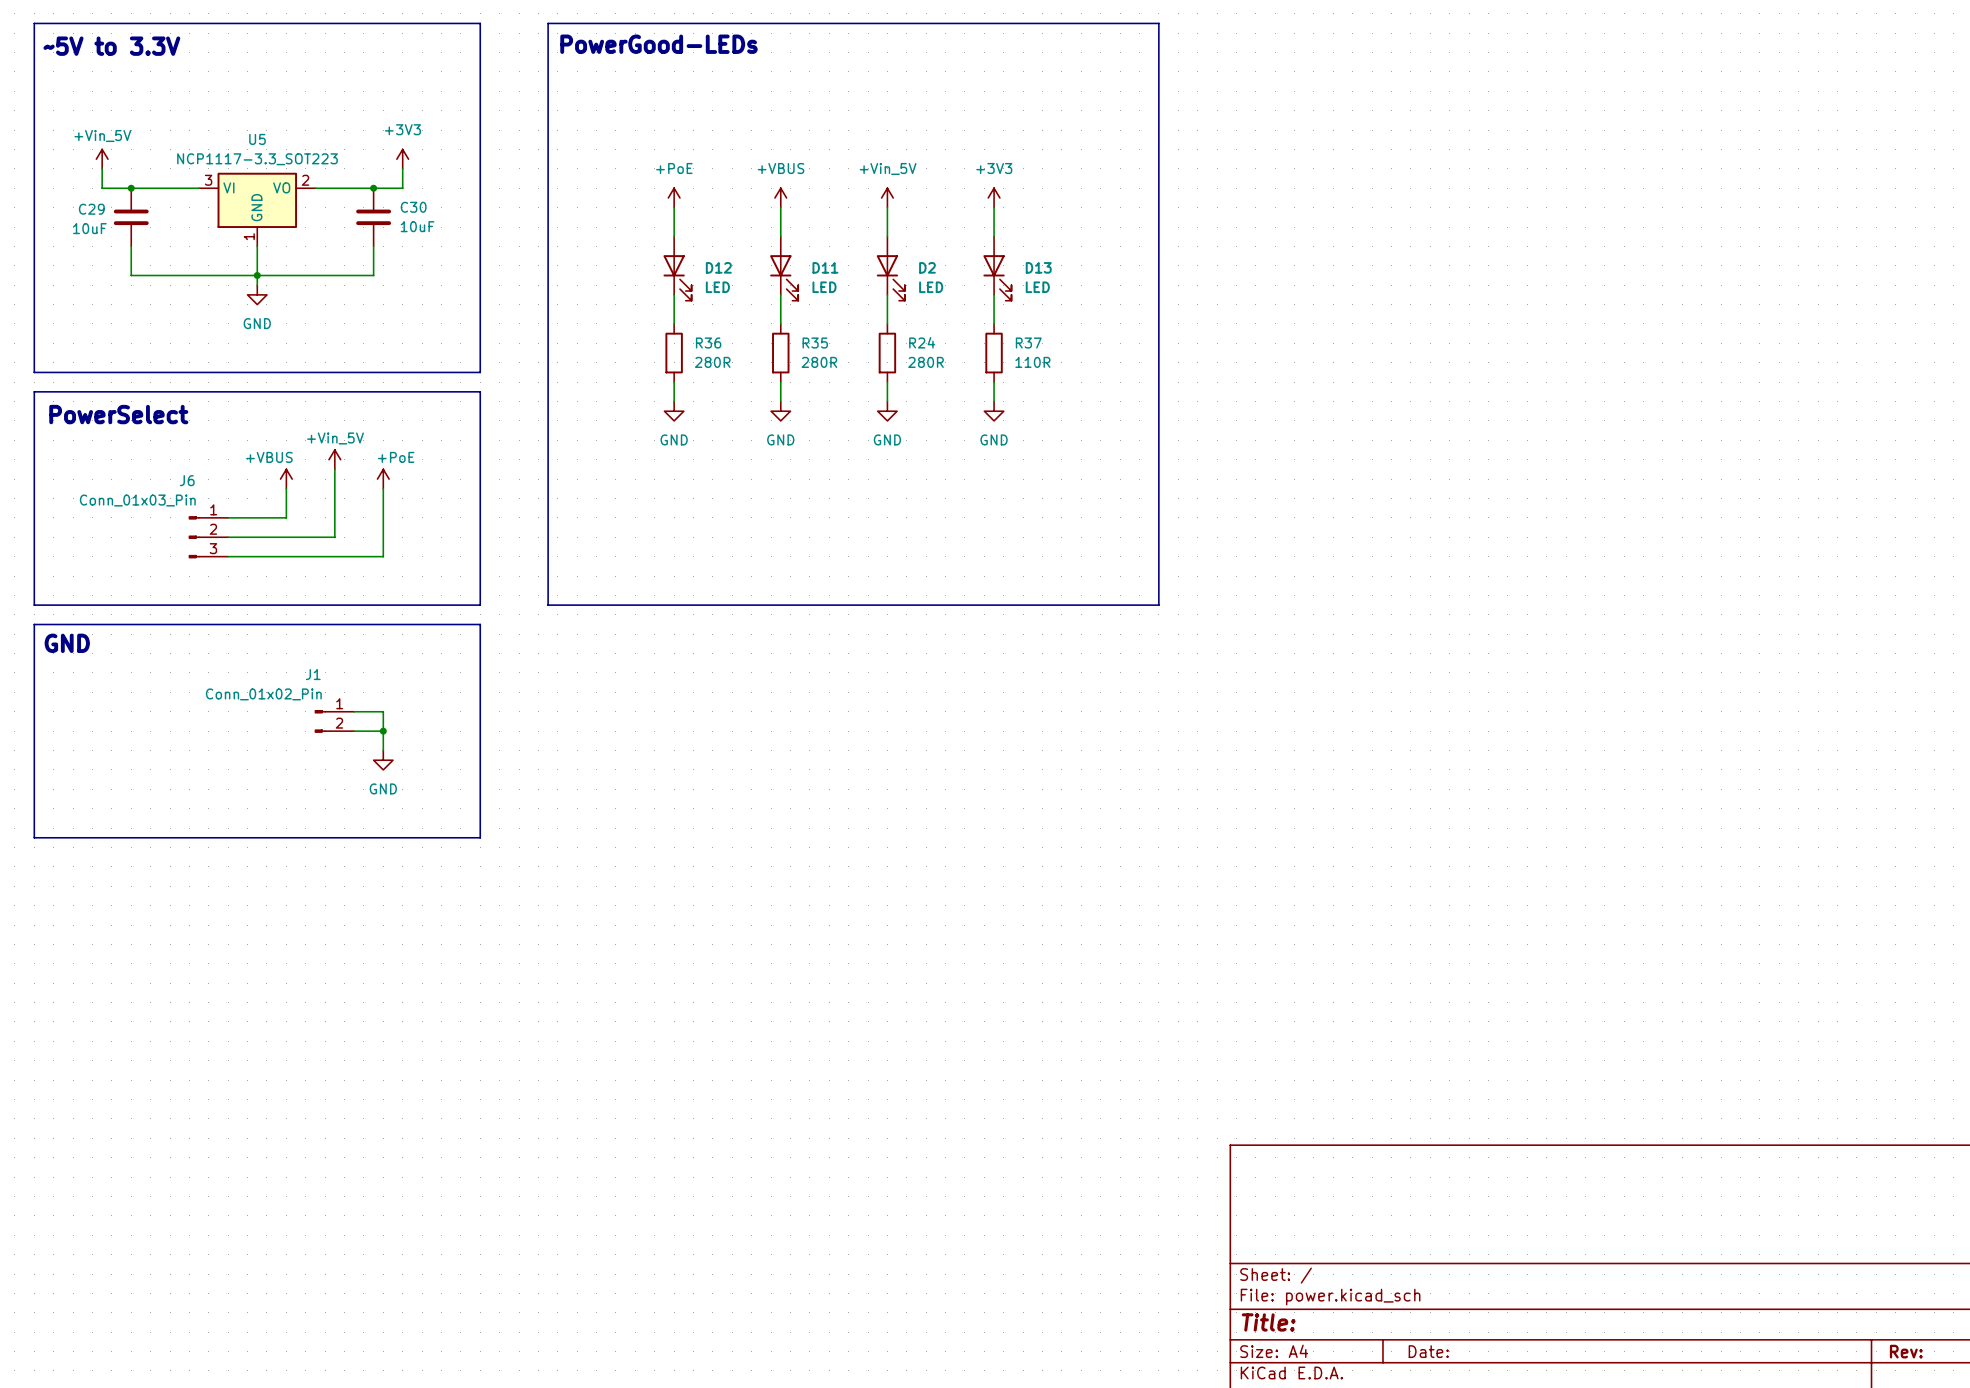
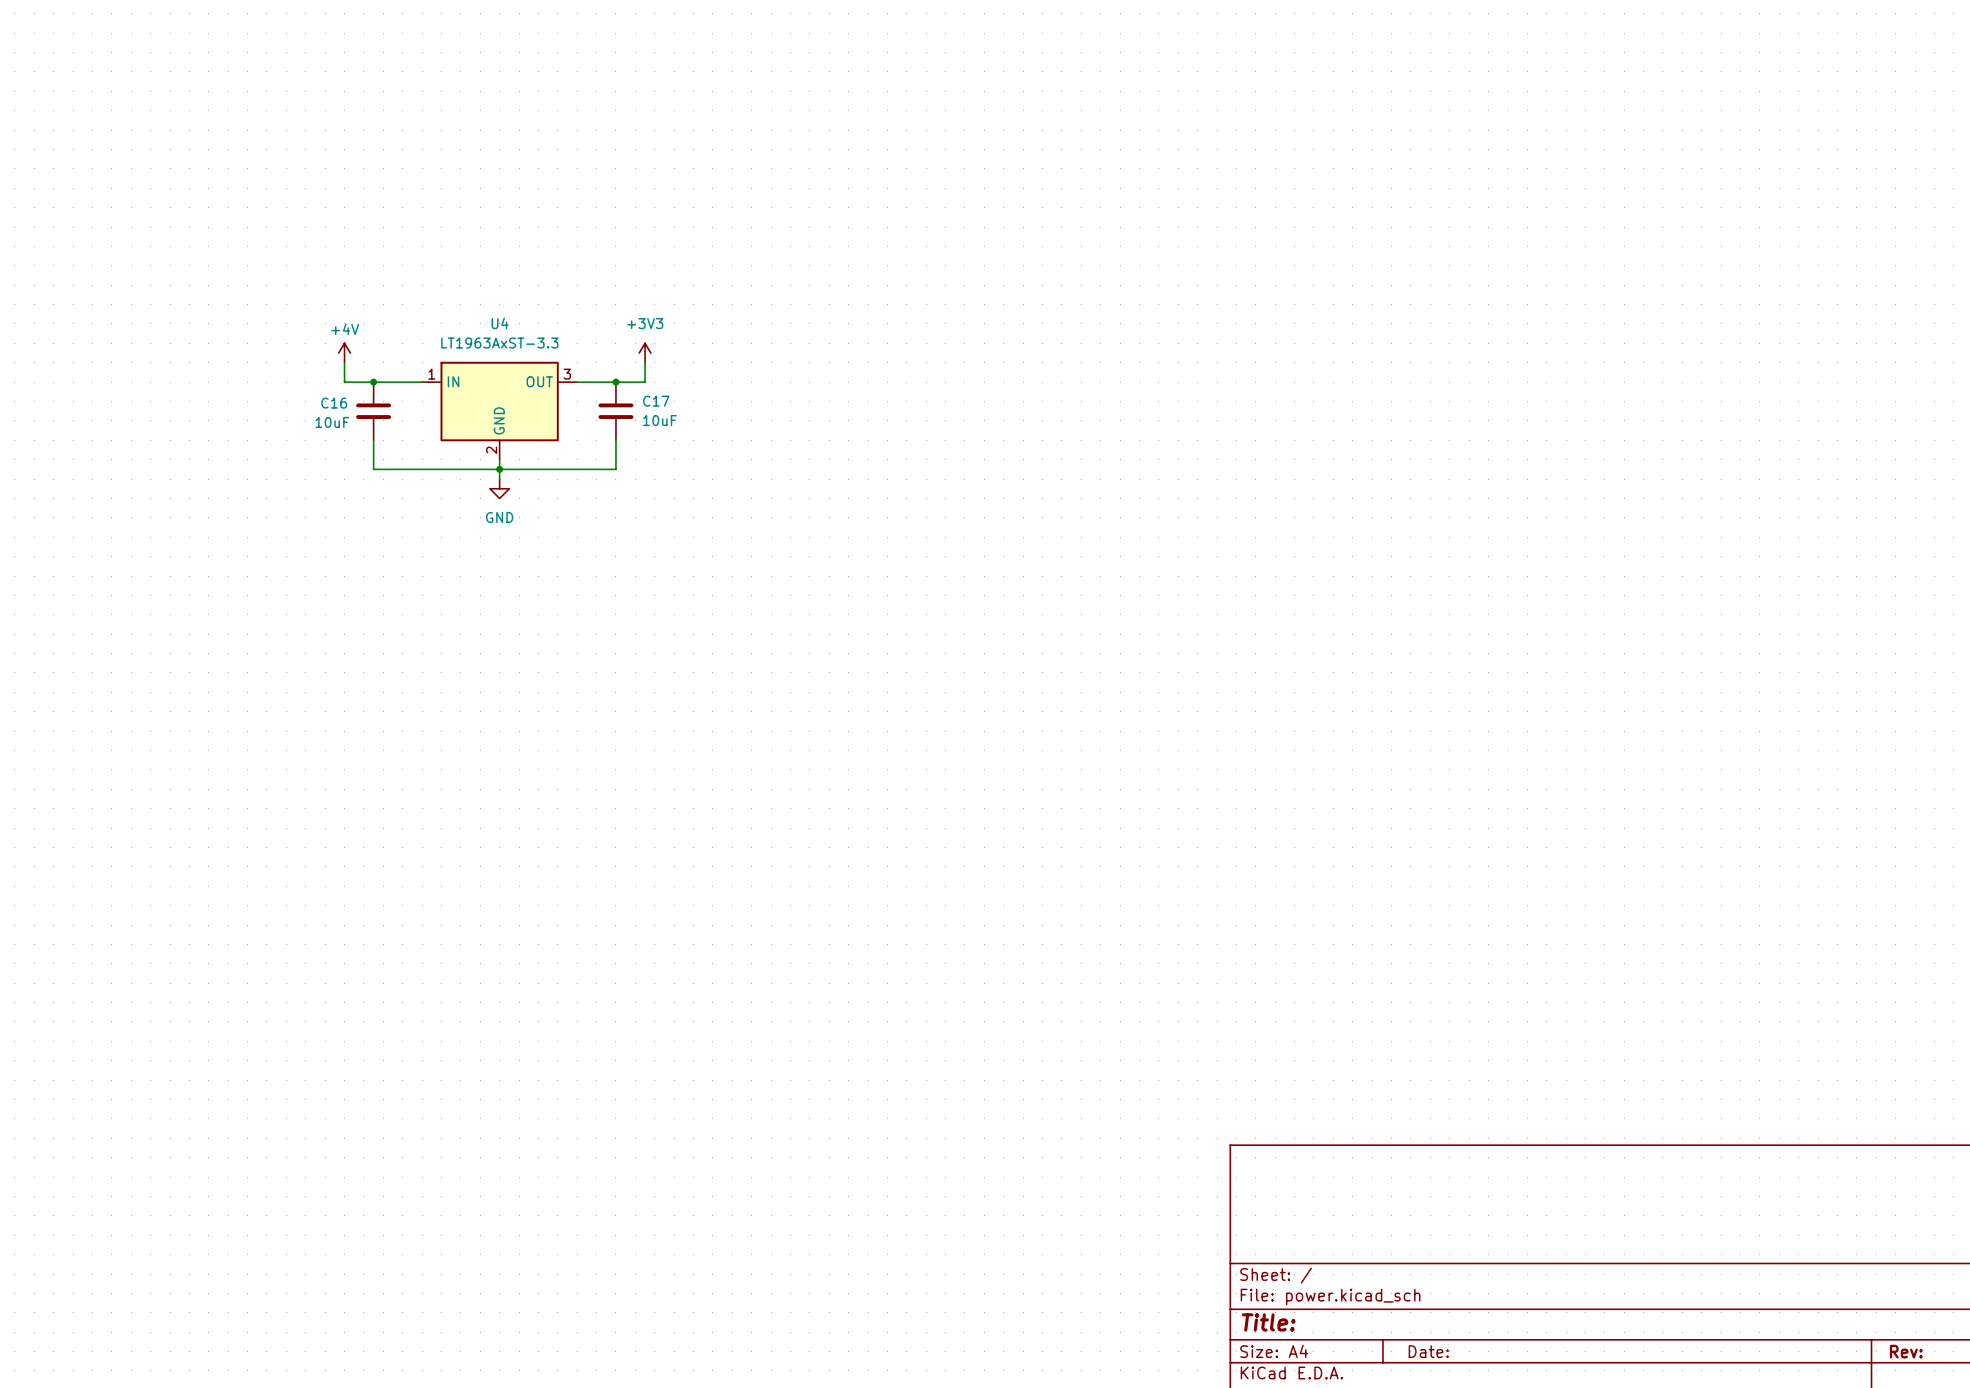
line: (34, 23) (34, 372) (480, 372) (480, 23) (34, 23) -> none
line: (548, 23) (1158, 23) (1158, 605) (548, 605) (548, 23) -> none
text: PowerGood-LEDs (658, 44) -> none
text: ~5V to 3.3V (111, 46) -> none
power symbol: +Vin_5V (102, 159) -> none
power symbol: +3V3 (402, 159) -> none
wire: (102, 168) (102, 188) (199, 188) -> none
wire: (402, 168) (402, 188) (315, 188) -> none
junction: (131, 188) -> none
junction: (373, 188) -> none
power symbol: +PoE (674, 197) -> none
power symbol: +VBUS (780, 197) -> none
power symbol: +Vin_5V (887, 197) -> none
power symbol: +3V3 (994, 197) -> none
wire: (674, 207) (674, 236) -> none
wire: (780, 207) (780, 236) -> none
wire: (887, 207) (887, 236) -> none
wire: (994, 207) (994, 236) -> none
U5: NCP1117-3.3_SOT223 (257, 209) -> none
C29: 10uF (131, 217) -> none
C30: 10uF (373, 217) -> none
wire: (131, 246) (131, 275) (373, 275) (373, 246) -> none
wire: (257, 246) (257, 285) -> none
D12: LED (677, 268) -> none
D11: LED (784, 268) -> none
D2: LED (890, 268) -> none
D13: LED (997, 268) -> none
junction: (257, 275) -> none
power symbol: GND (257, 294) -> none
wire: (674, 294) (674, 323) -> none
wire: (780, 294) (780, 323) -> none
wire: (887, 294) (887, 323) -> none
wire: (994, 294) (994, 323) -> none
power symbol: none -> +4V (344, 353)
power symbol: none -> +3V3 (645, 353)
R36: 280R (674, 353) -> none
R35: 280R (780, 353) -> none
R24: 280R (887, 353) -> none
R37: 110R (994, 353) -> none
wire: none -> (344, 362) (344, 382) (422, 382)
wire: none -> (645, 362) (645, 382) (577, 382)
junction: none -> (373, 382)
junction: none -> (615, 382)
wire: (674, 382) (674, 401) -> none
wire: (780, 382) (780, 401) -> none
wire: (887, 382) (887, 401) -> none
wire: (994, 382) (994, 401) -> none
line: (34, 391) (34, 605) (480, 605) (480, 391) (34, 391) -> none
U4: none -> LT1963AxST-3.3 (499, 410)
C16: none -> 10uF (373, 411)
C17: none -> 10uF (615, 411)
power symbol: GND (674, 411) -> none
power symbol: GND (780, 411) -> none
power symbol: GND (887, 411) -> none
power symbol: GND (994, 411) -> none
text: PowerSelect (118, 414) -> none
wire: none -> (373, 440) (373, 469) (615, 469) (615, 440)
power symbol: +Vin_5V (334, 459) -> none
wire: none -> (499, 459) (499, 479)
wire: (334, 469) (334, 537) (228, 537) -> none
junction: none -> (499, 469)
power symbol: +VBUS (286, 479) -> none
power symbol: +PoE (383, 479) -> none
wire: (286, 488) (286, 517) (228, 517) -> none
wire: (383, 488) (383, 556) (228, 556) -> none
power symbol: none -> GND (499, 488)
J6: Conn_01x03_Pin (208, 537) -> none
line: (34, 624) (480, 624) (480, 837) (34, 837) (34, 624) -> none
text: GND (67, 643) -> none
wire: (354, 711) (383, 711) (383, 750) -> none
J1: Conn_01x02_Pin (334, 721) -> none
wire: (354, 731) (383, 731) -> none
junction: (383, 731) -> none
power symbol: GND (383, 760) -> none

